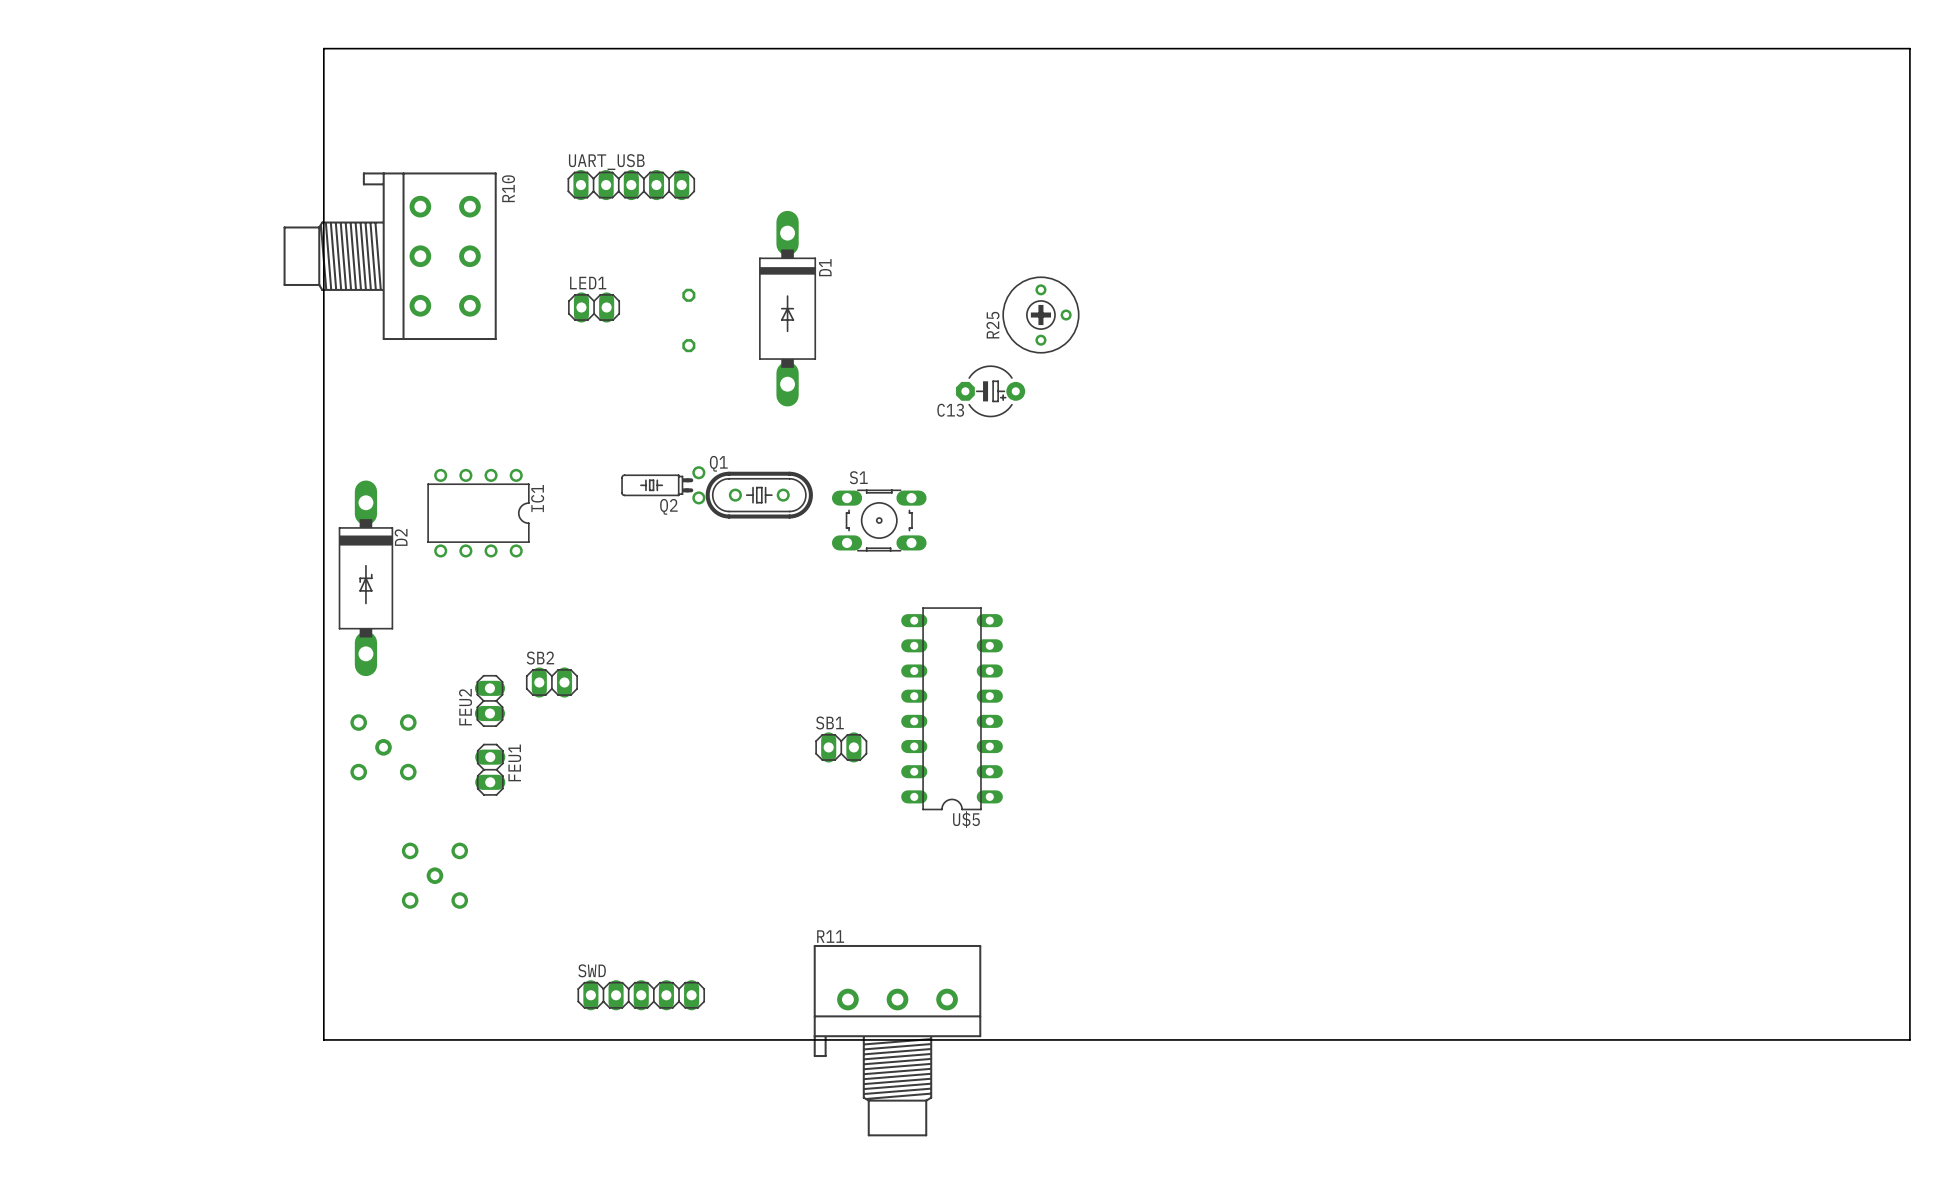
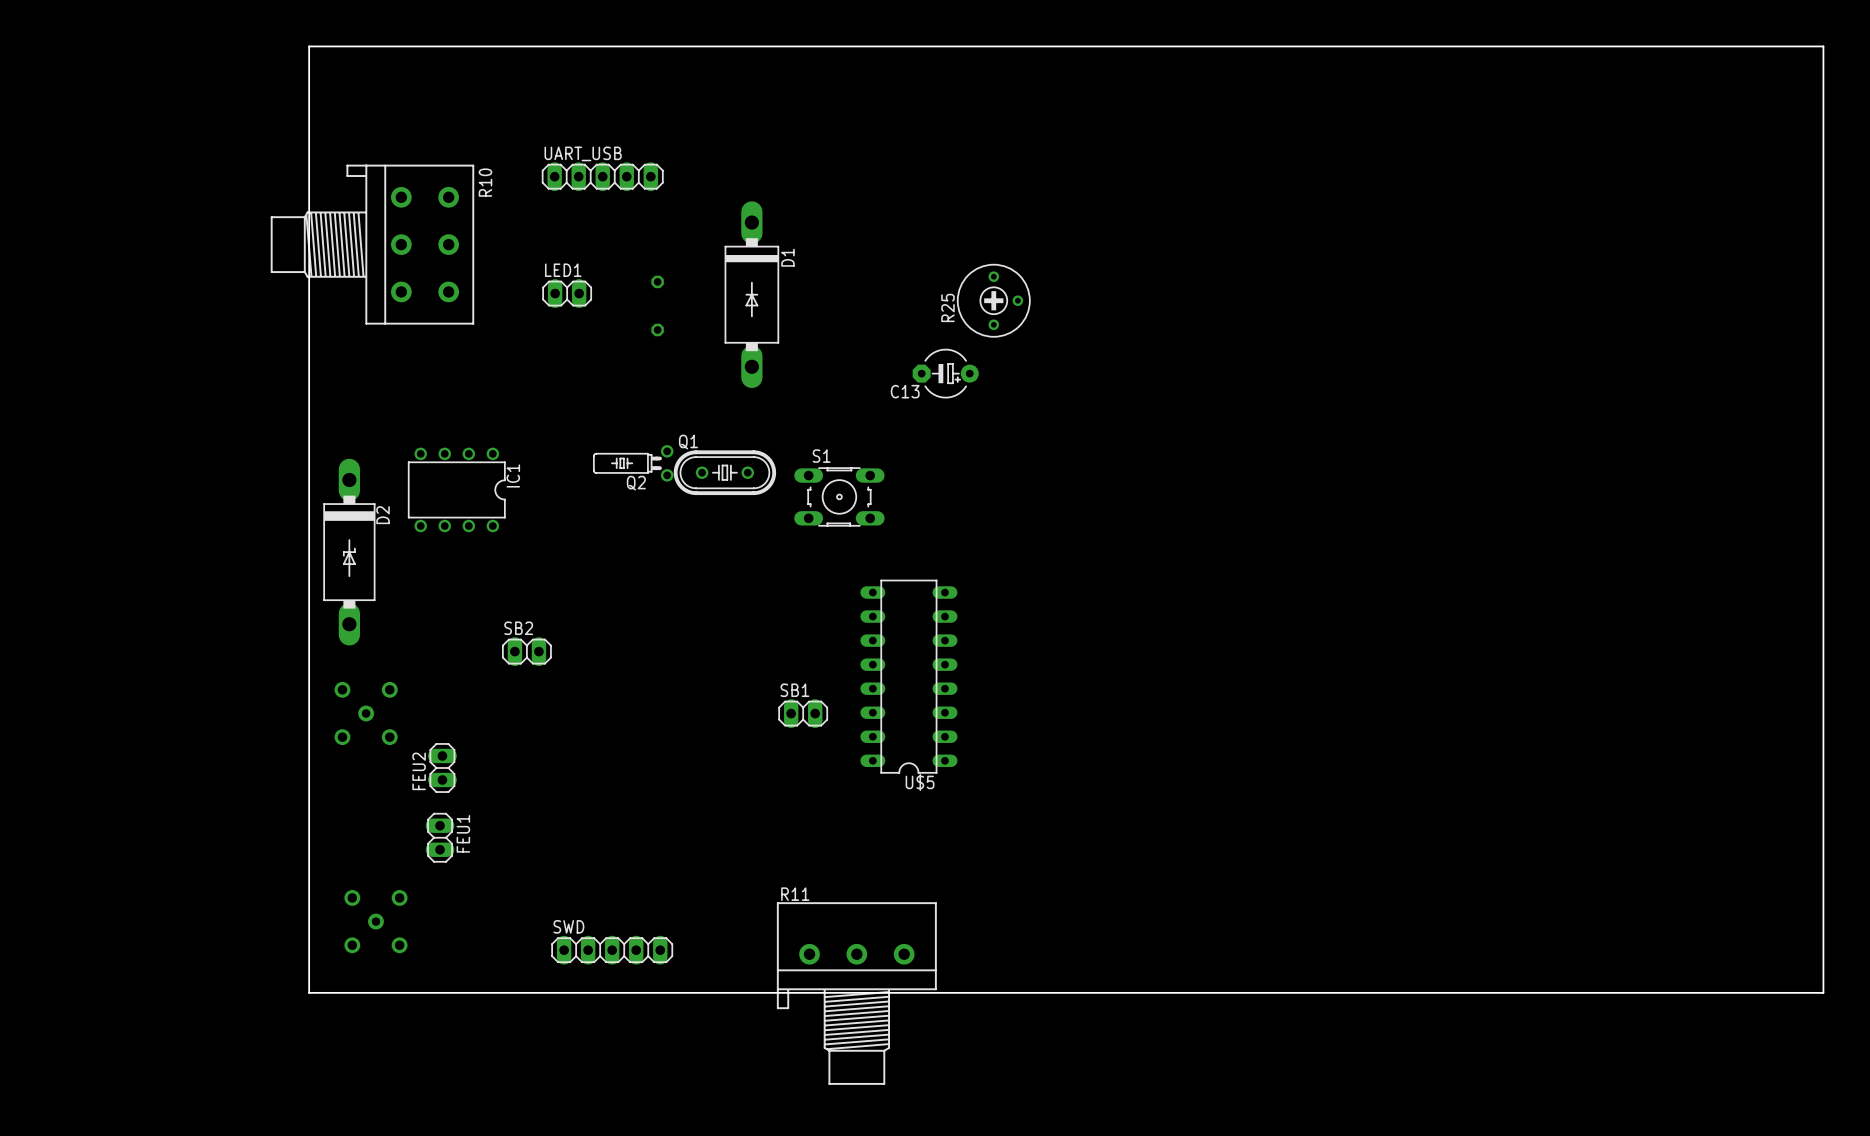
FEU2 position: (489, 700) -> (442, 767)
FEU1 position: (490, 769) -> (440, 837)
part position: (434, 875) -> (375, 921)

